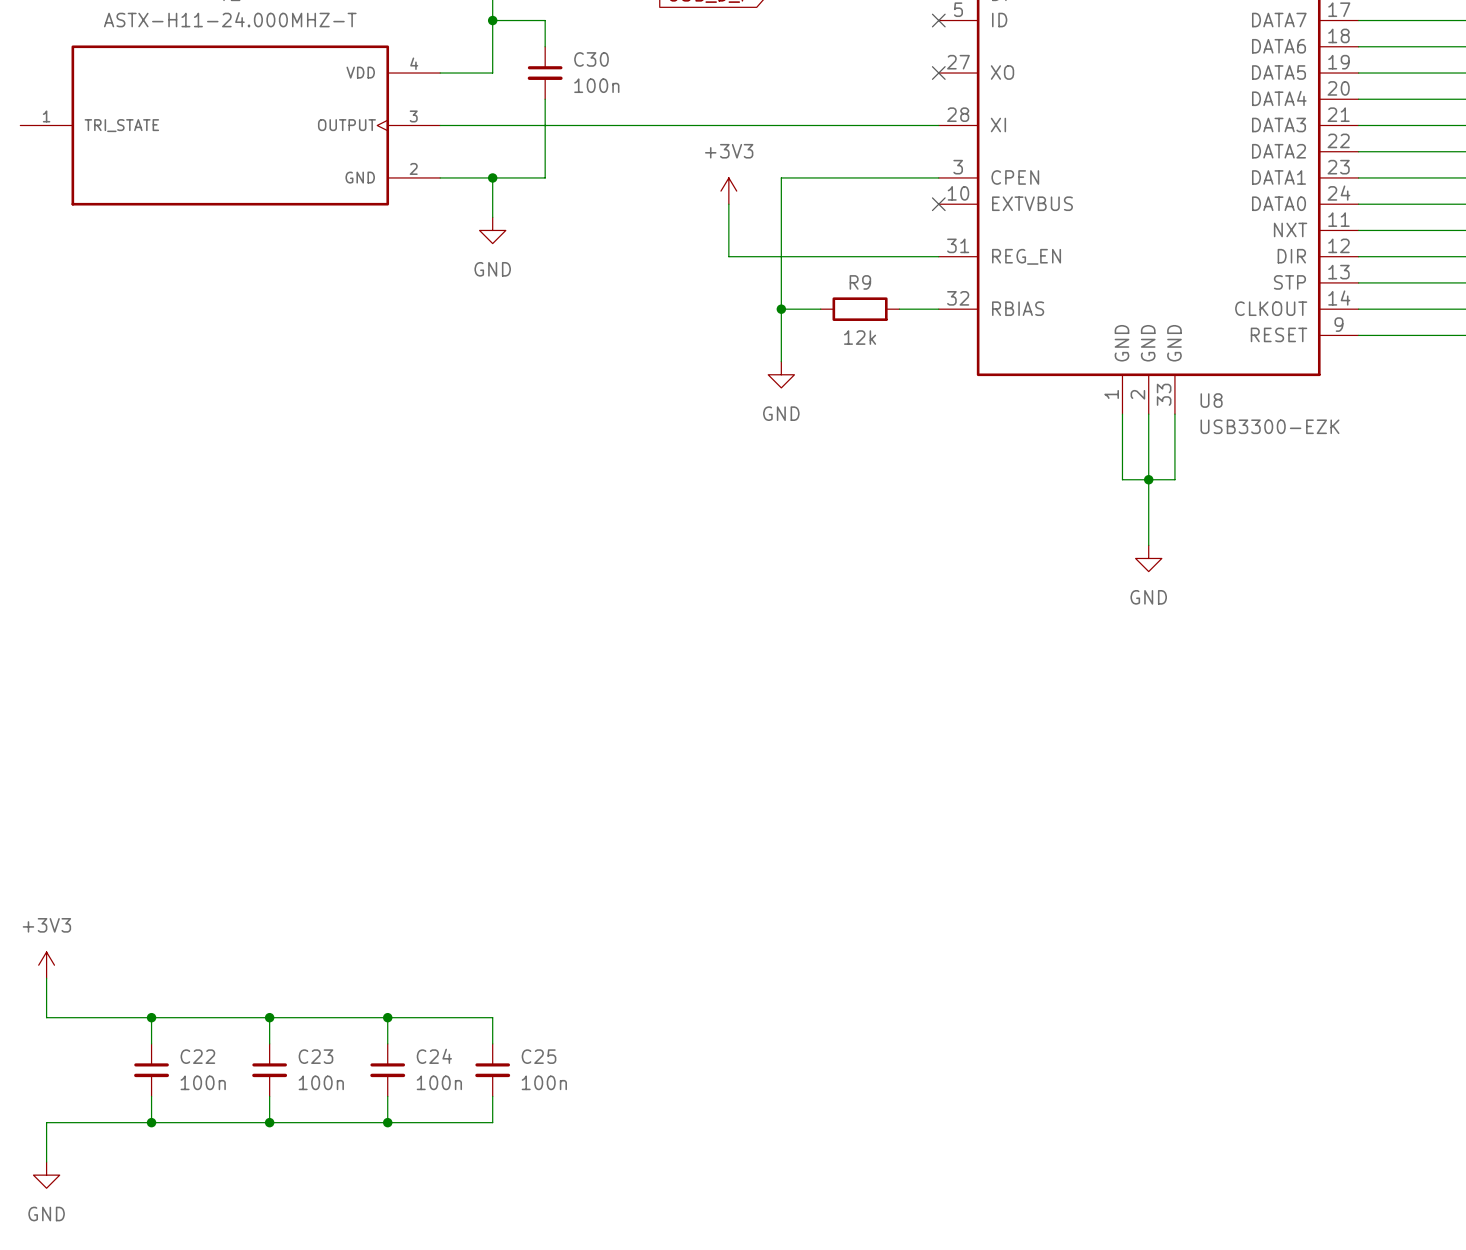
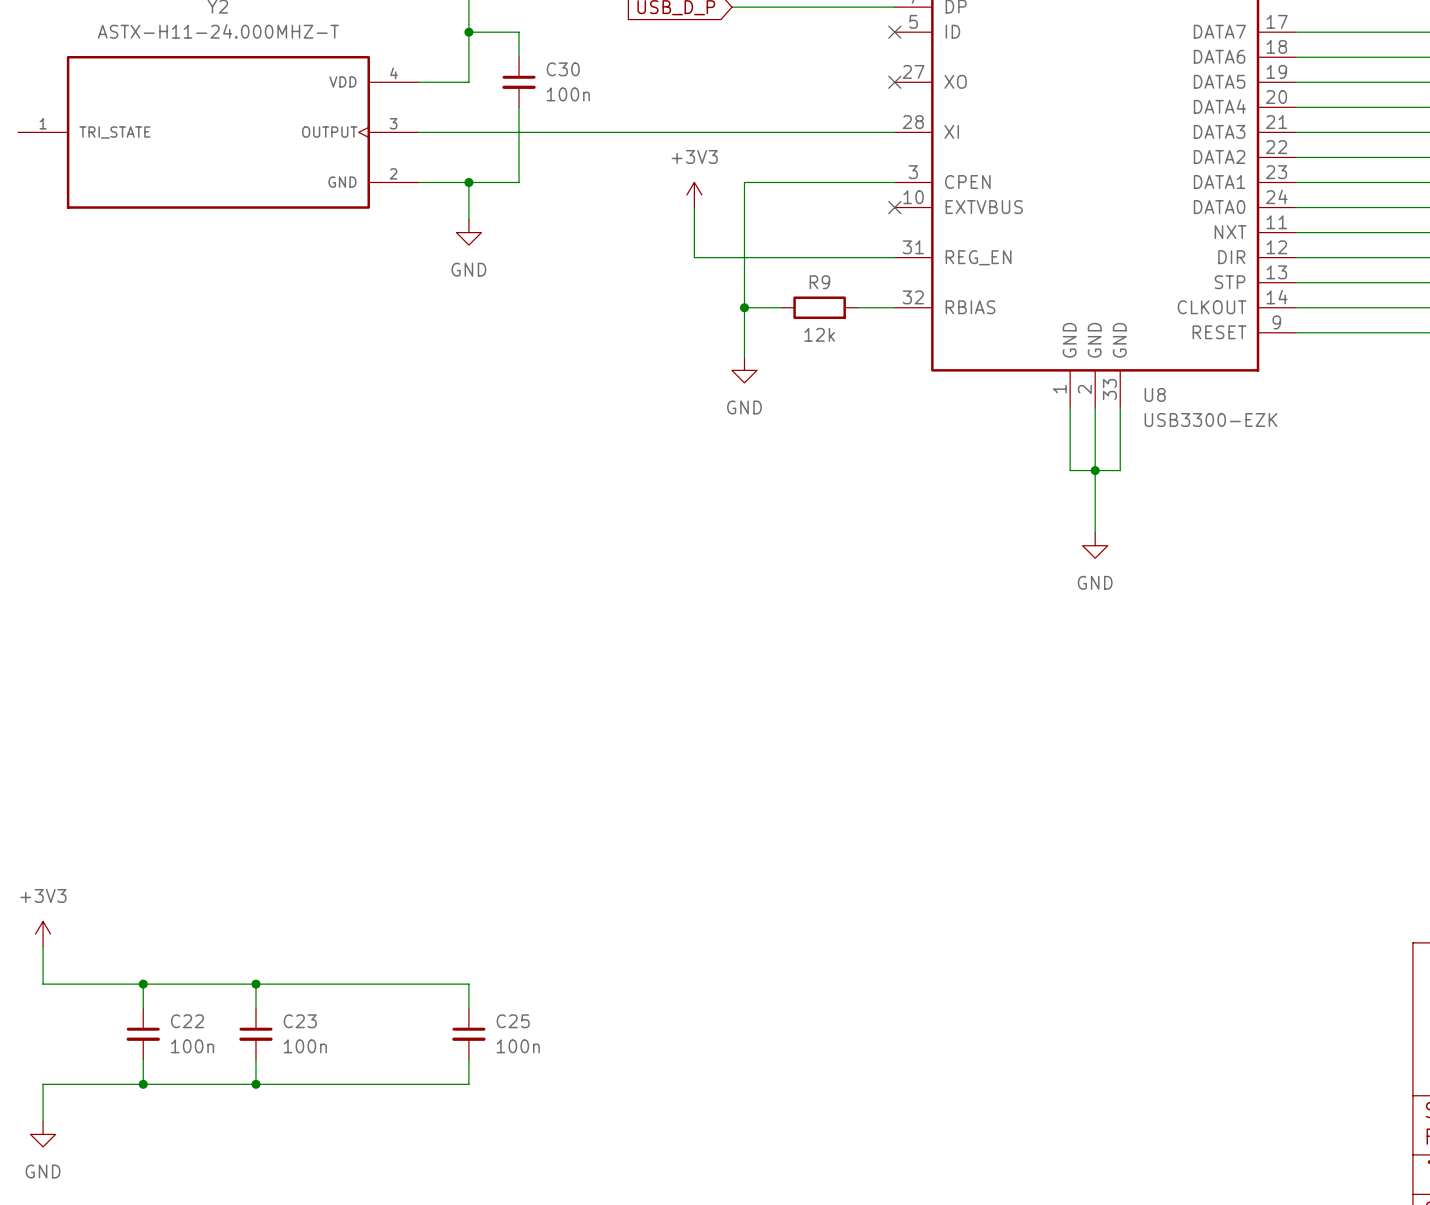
wire: (387, 1017) (387, 1043) -> none
junction: (387, 1017) -> none
C24: 100n (387, 1070) -> none
wire: (387, 1096) (387, 1122) -> none
junction: (387, 1122) -> none

